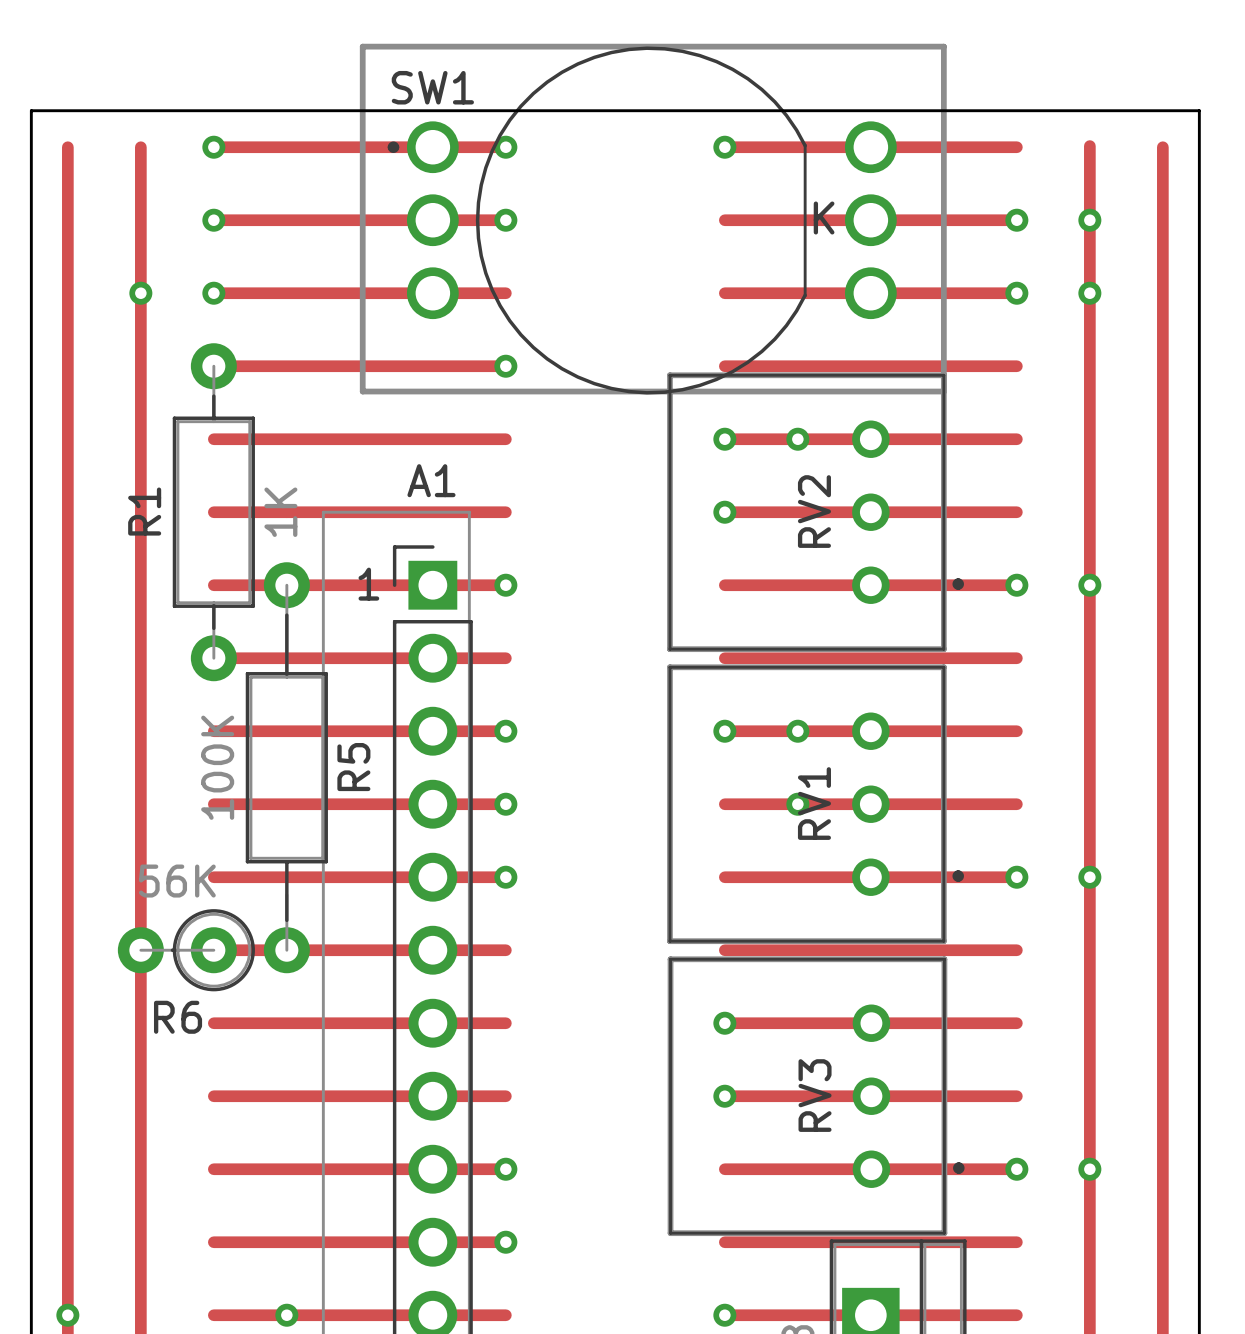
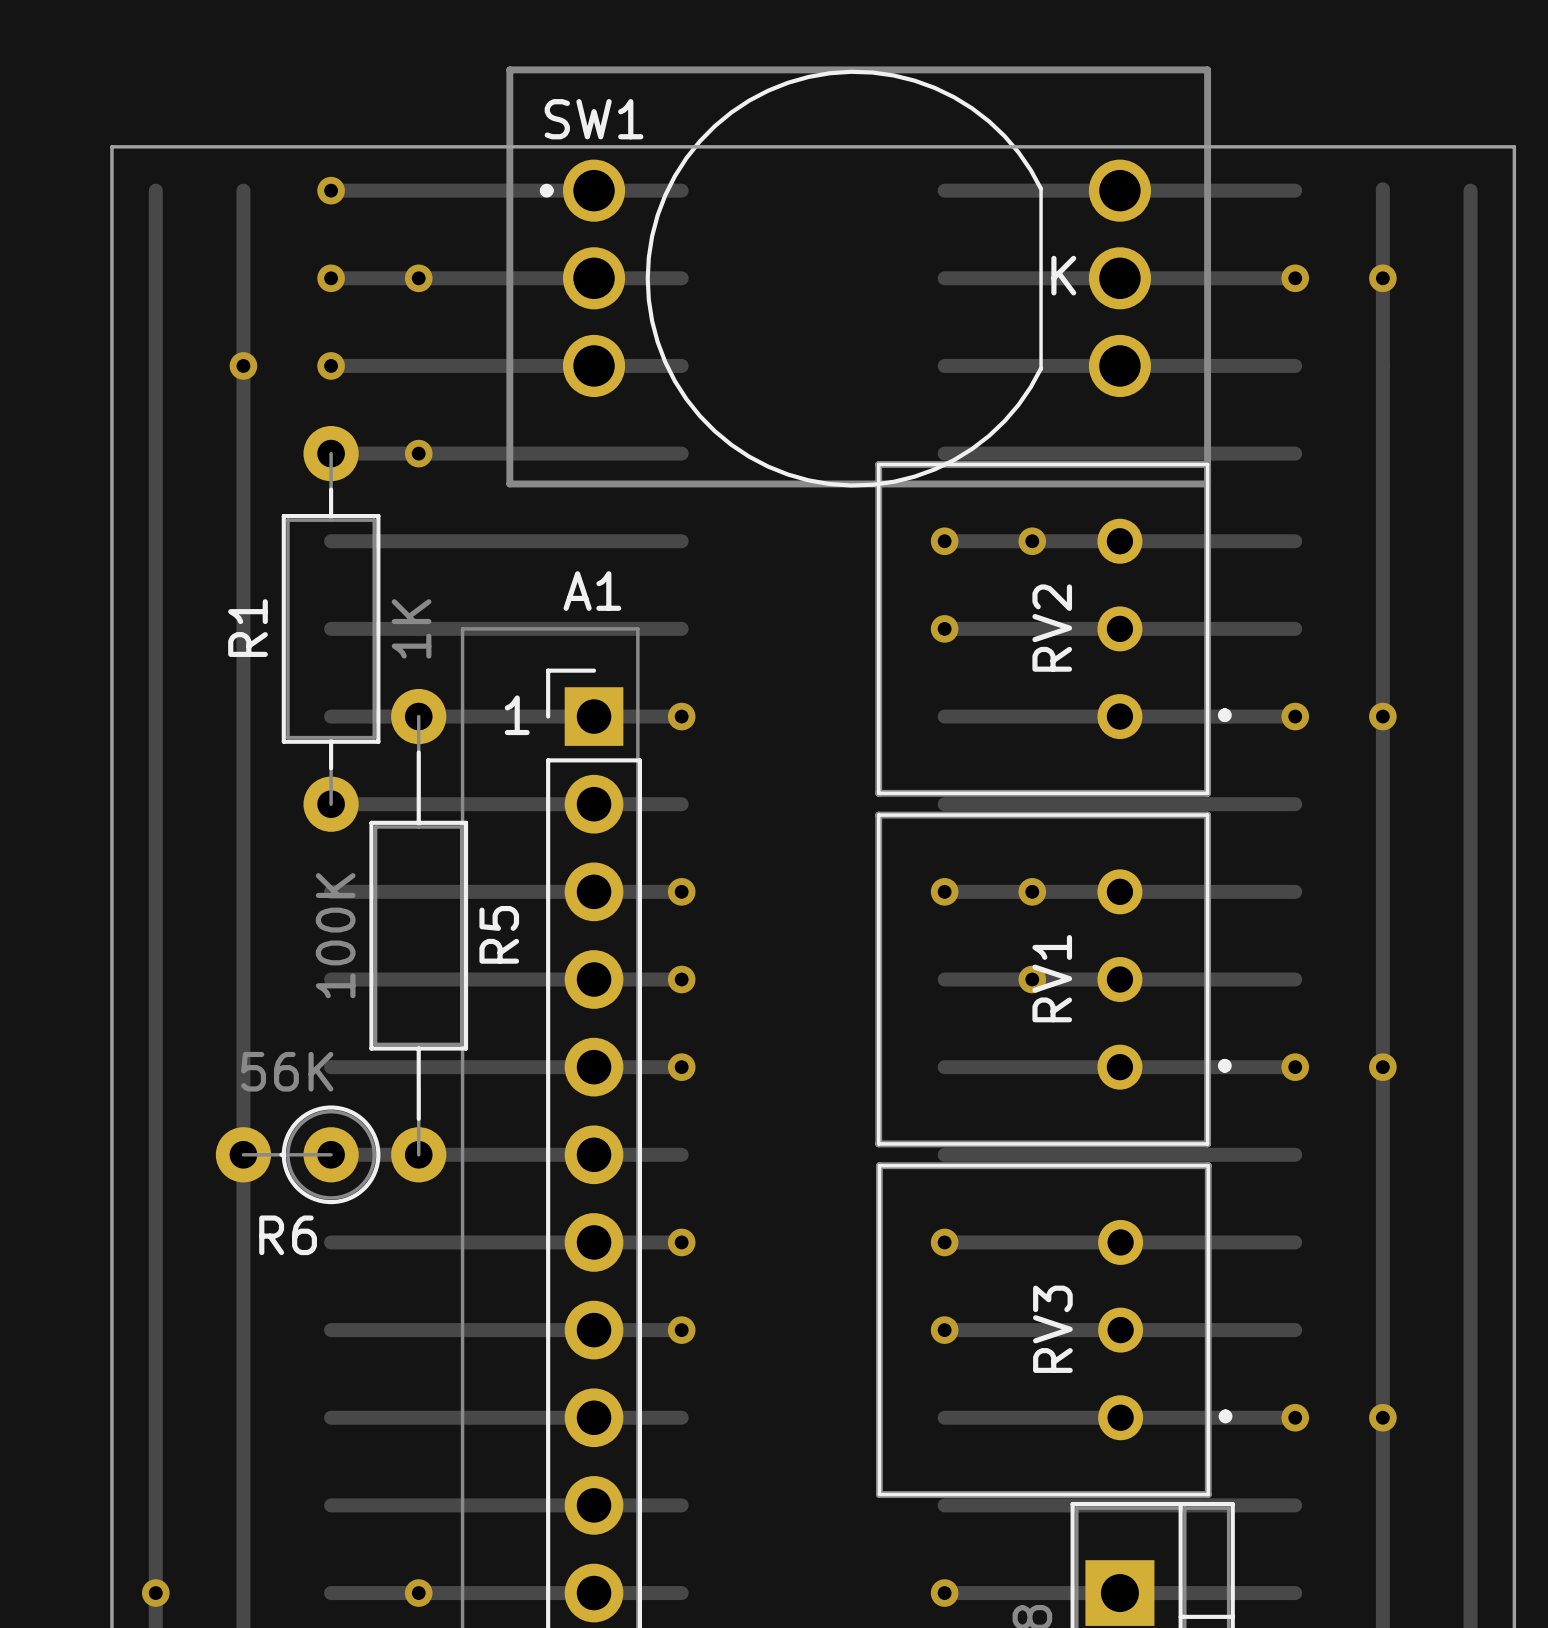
via: (505, 147) -> none
via: (724, 147) -> none
via: none -> (418, 278)
via: (505, 220) -> none
via: (1016, 293) -> none
via: (1089, 293) -> none
via: none -> (418, 453)
via: (505, 366) -> none
via: none -> (681, 1242)
via: none -> (681, 1330)
via: (505, 1169) -> none
via: (505, 1242) -> none

